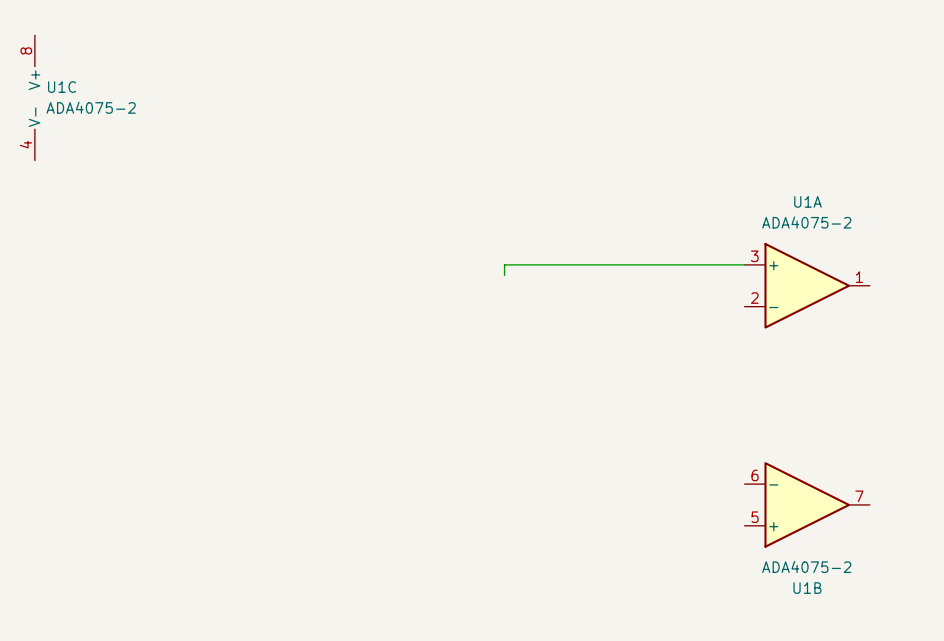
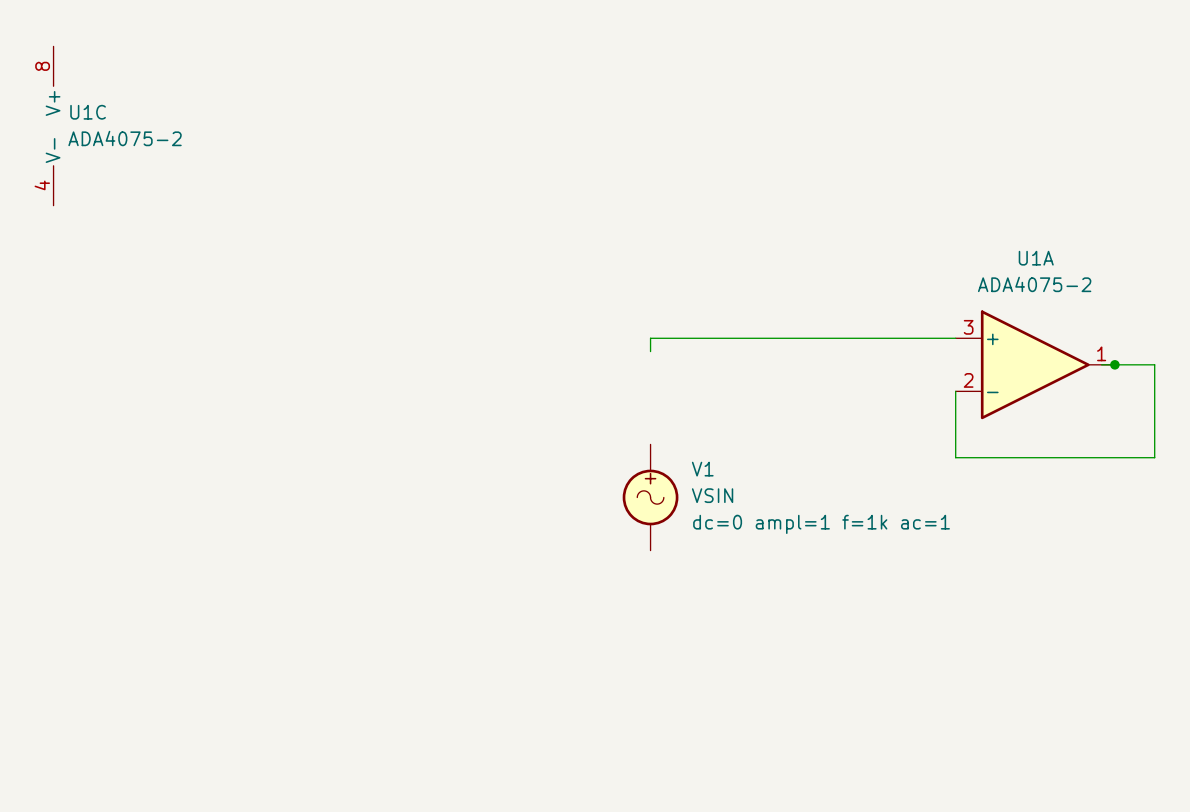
wire: none -> (1101, 364) (1154, 364) (1154, 457) (955, 457) (955, 391)
junction: none -> (1114, 364)
V1: none -> VSIN (650, 497)
U1B: ADA4075-2 (807, 504) -> none

